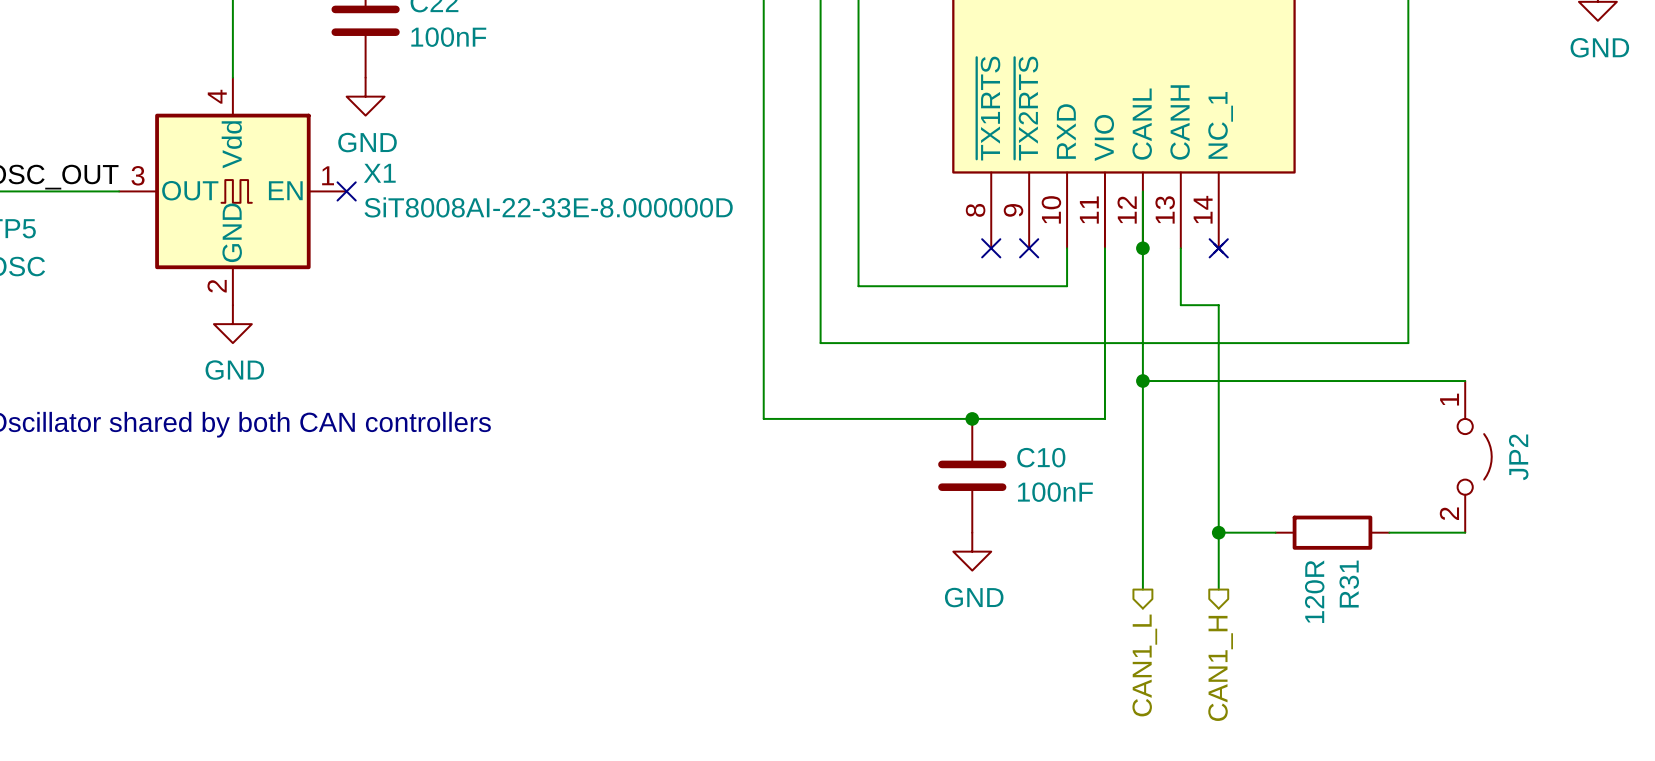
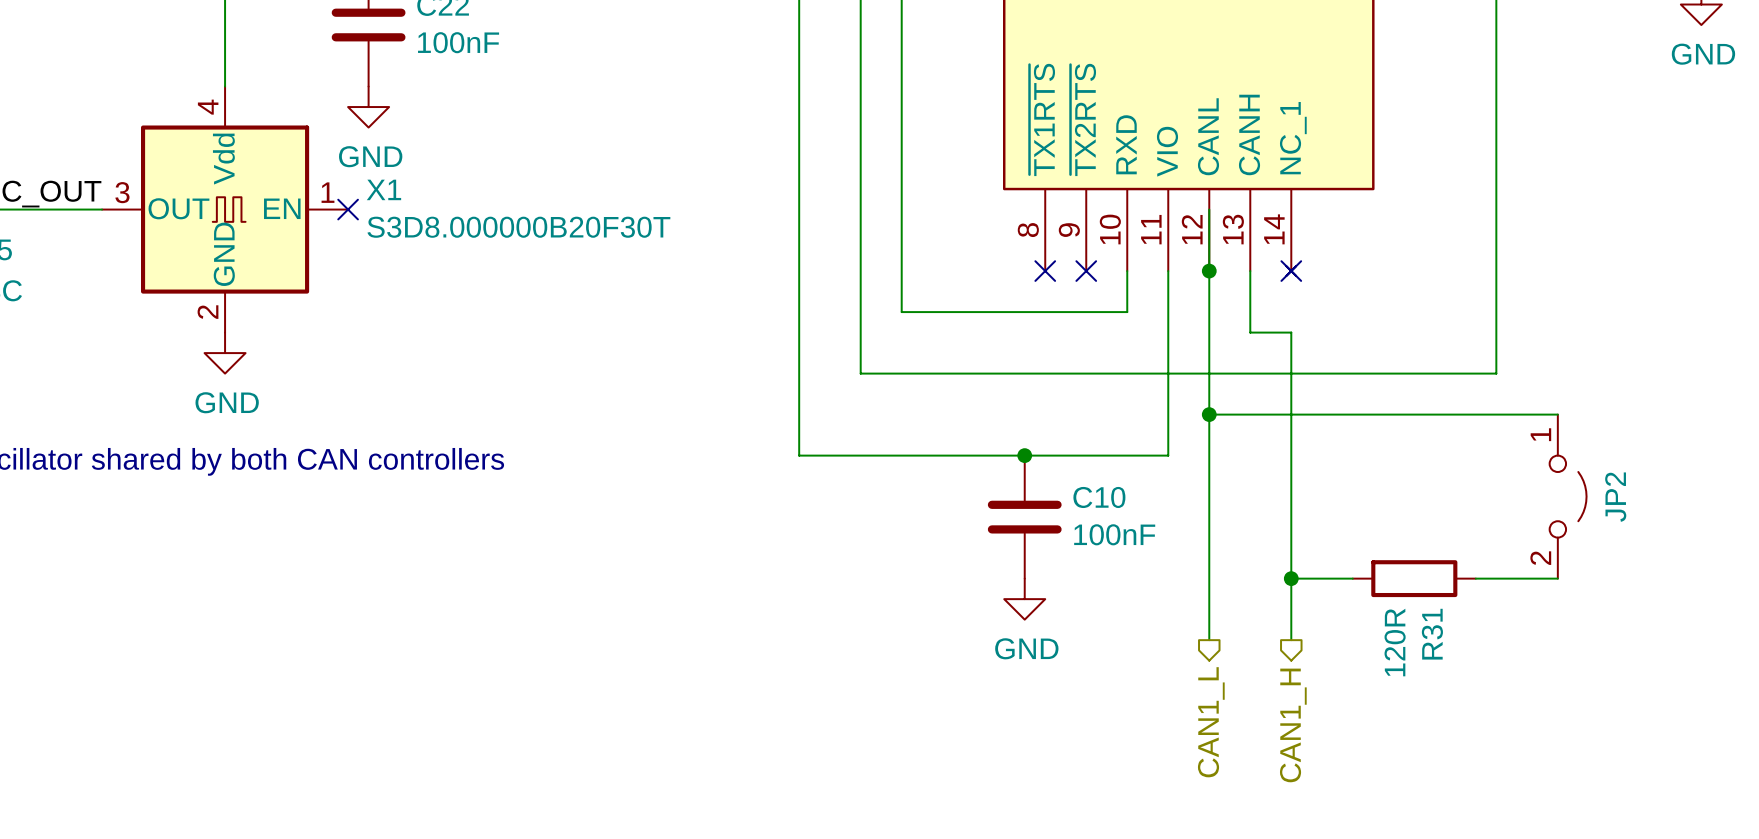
X1 value: SiT8008AI-22-33E-8.000000D (548, 207) -> S3D8.000000B20F30T (518, 227)

